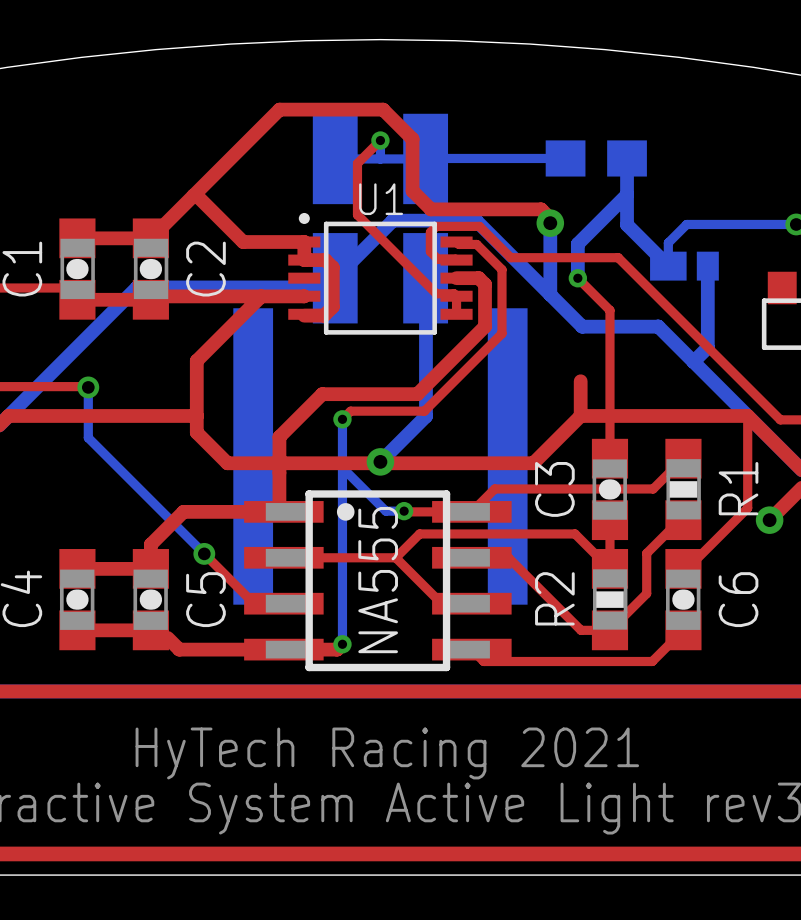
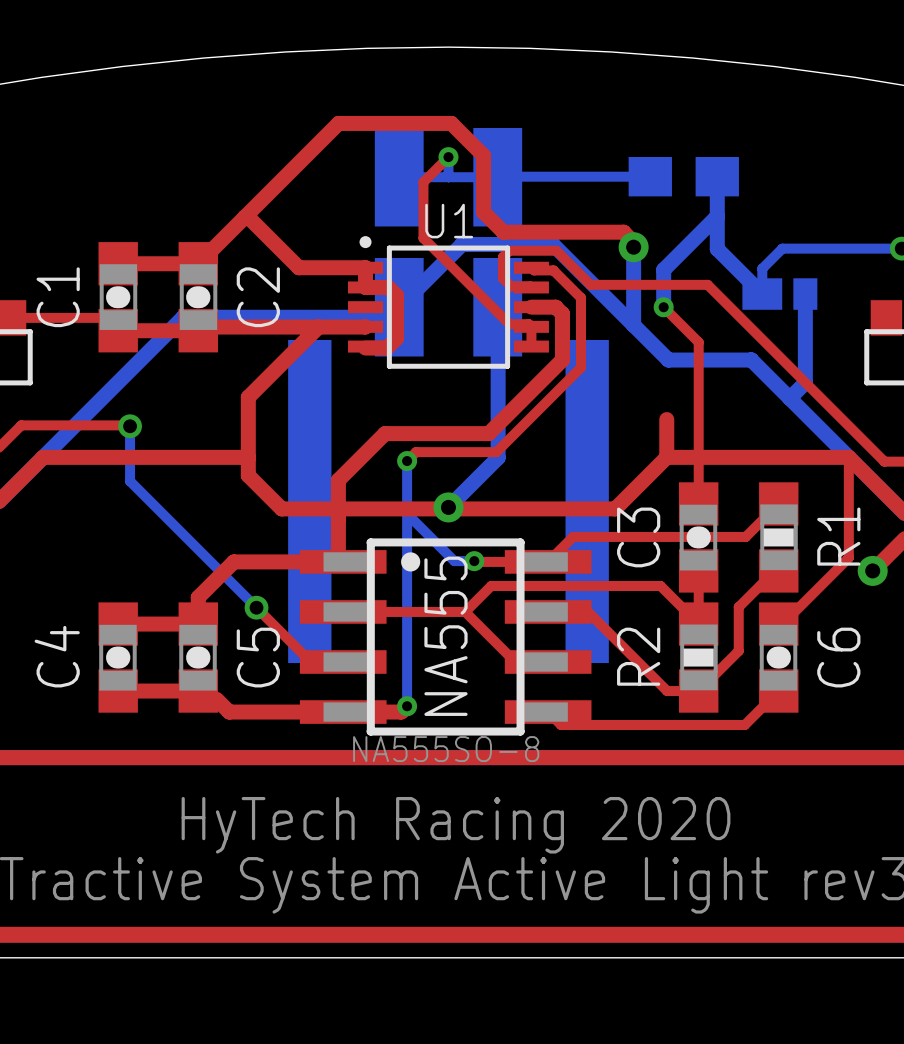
NA555 value: none -> NA555SO-8 (446, 749)
text: HyTech Racing 2021 (387, 753) -> HyTech Racing 2020 (456, 825)

